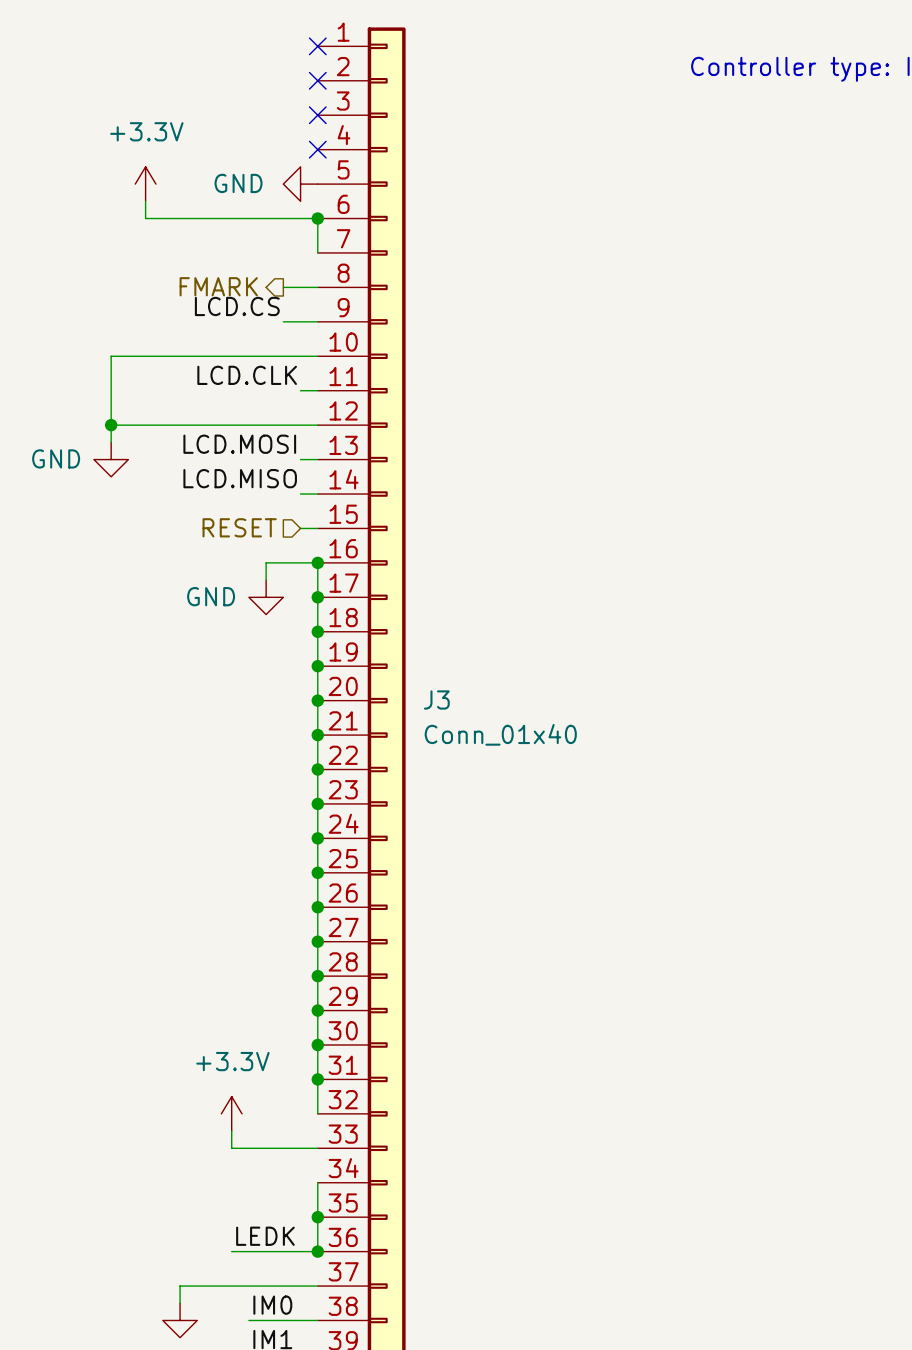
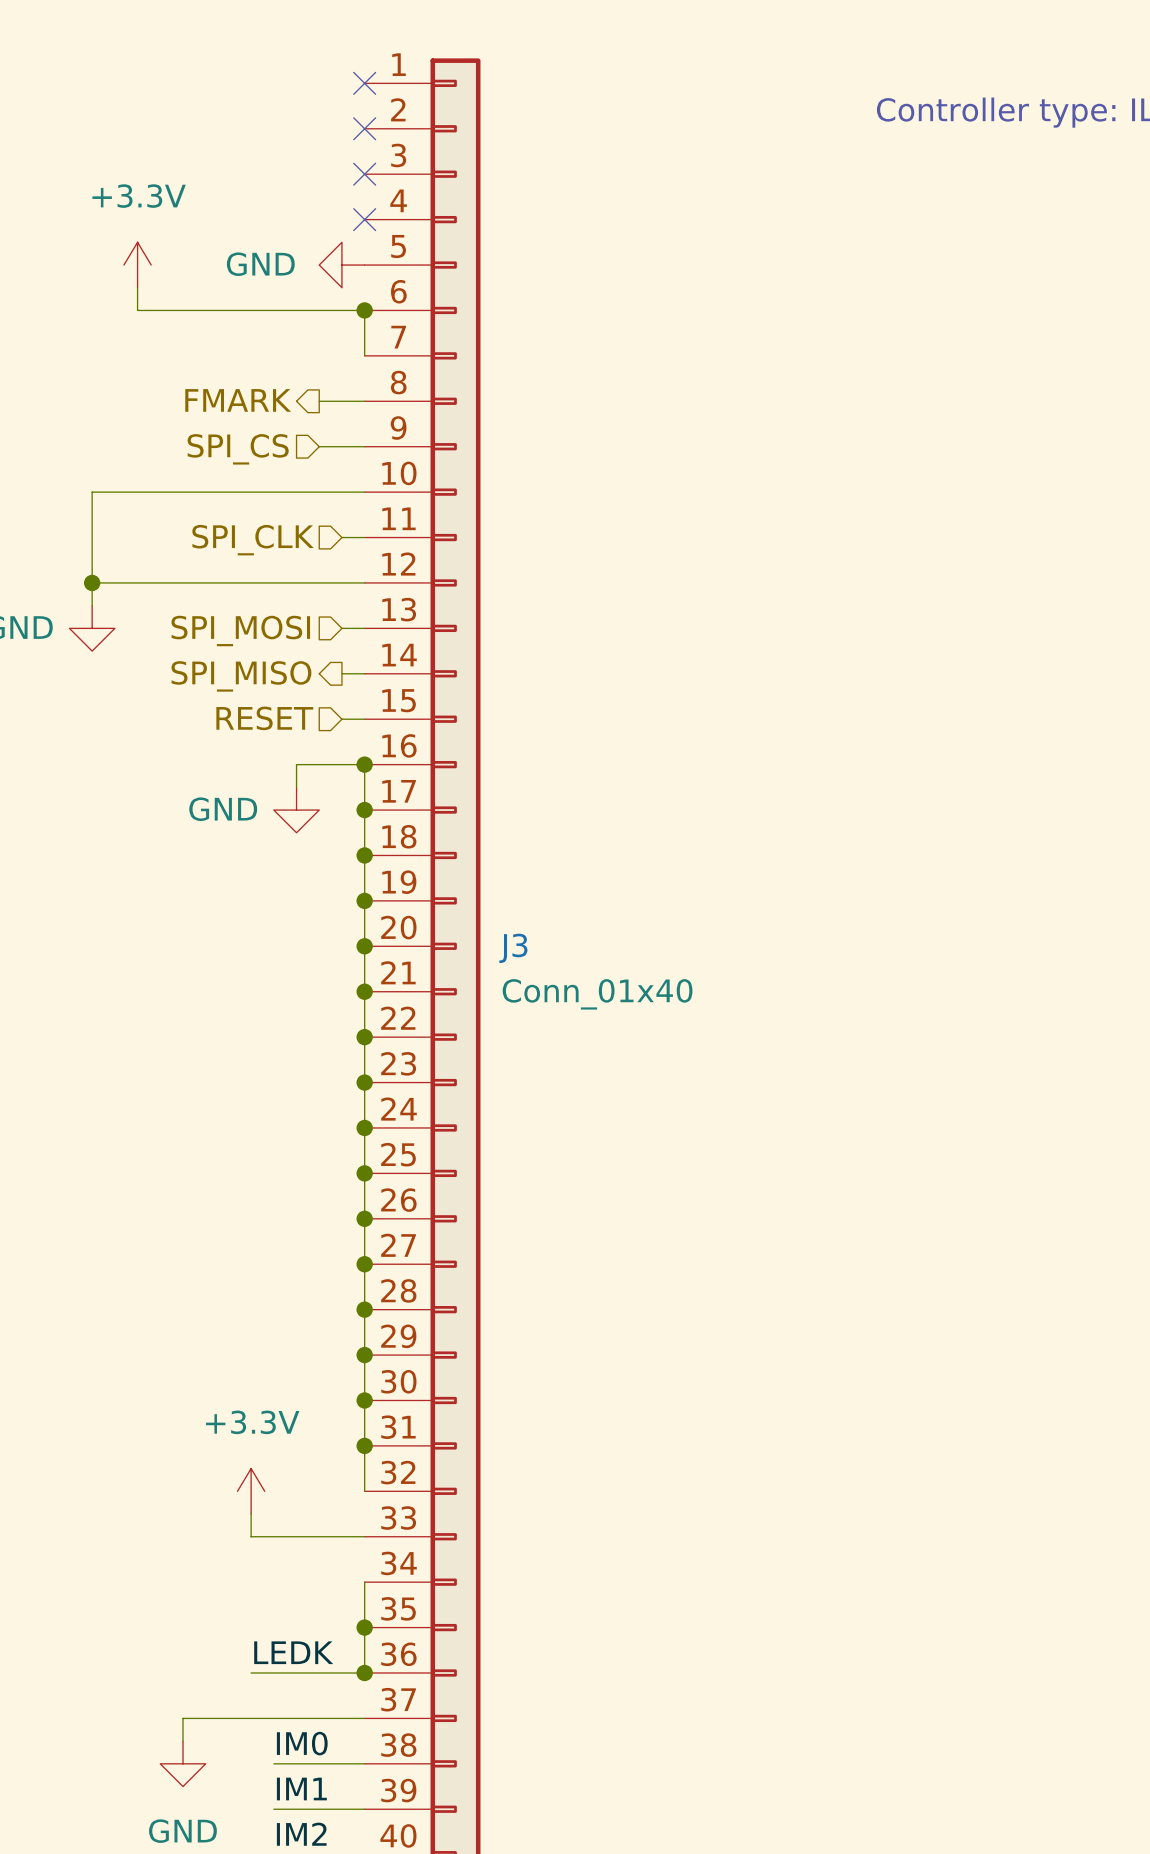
label: LCD.CS (237, 306) -> none
hierarchical label: none -> SPI_CS (238, 449)
label: LCD.CLK (247, 375) -> none
hierarchical label: none -> SPI_CLK (253, 540)
label: LCD.MOSI (239, 444) -> none
hierarchical label: none -> SPI_MOSI (240, 631)
label: LCD.MISO (240, 478) -> none
hierarchical label: none -> SPI_MISO (241, 676)

